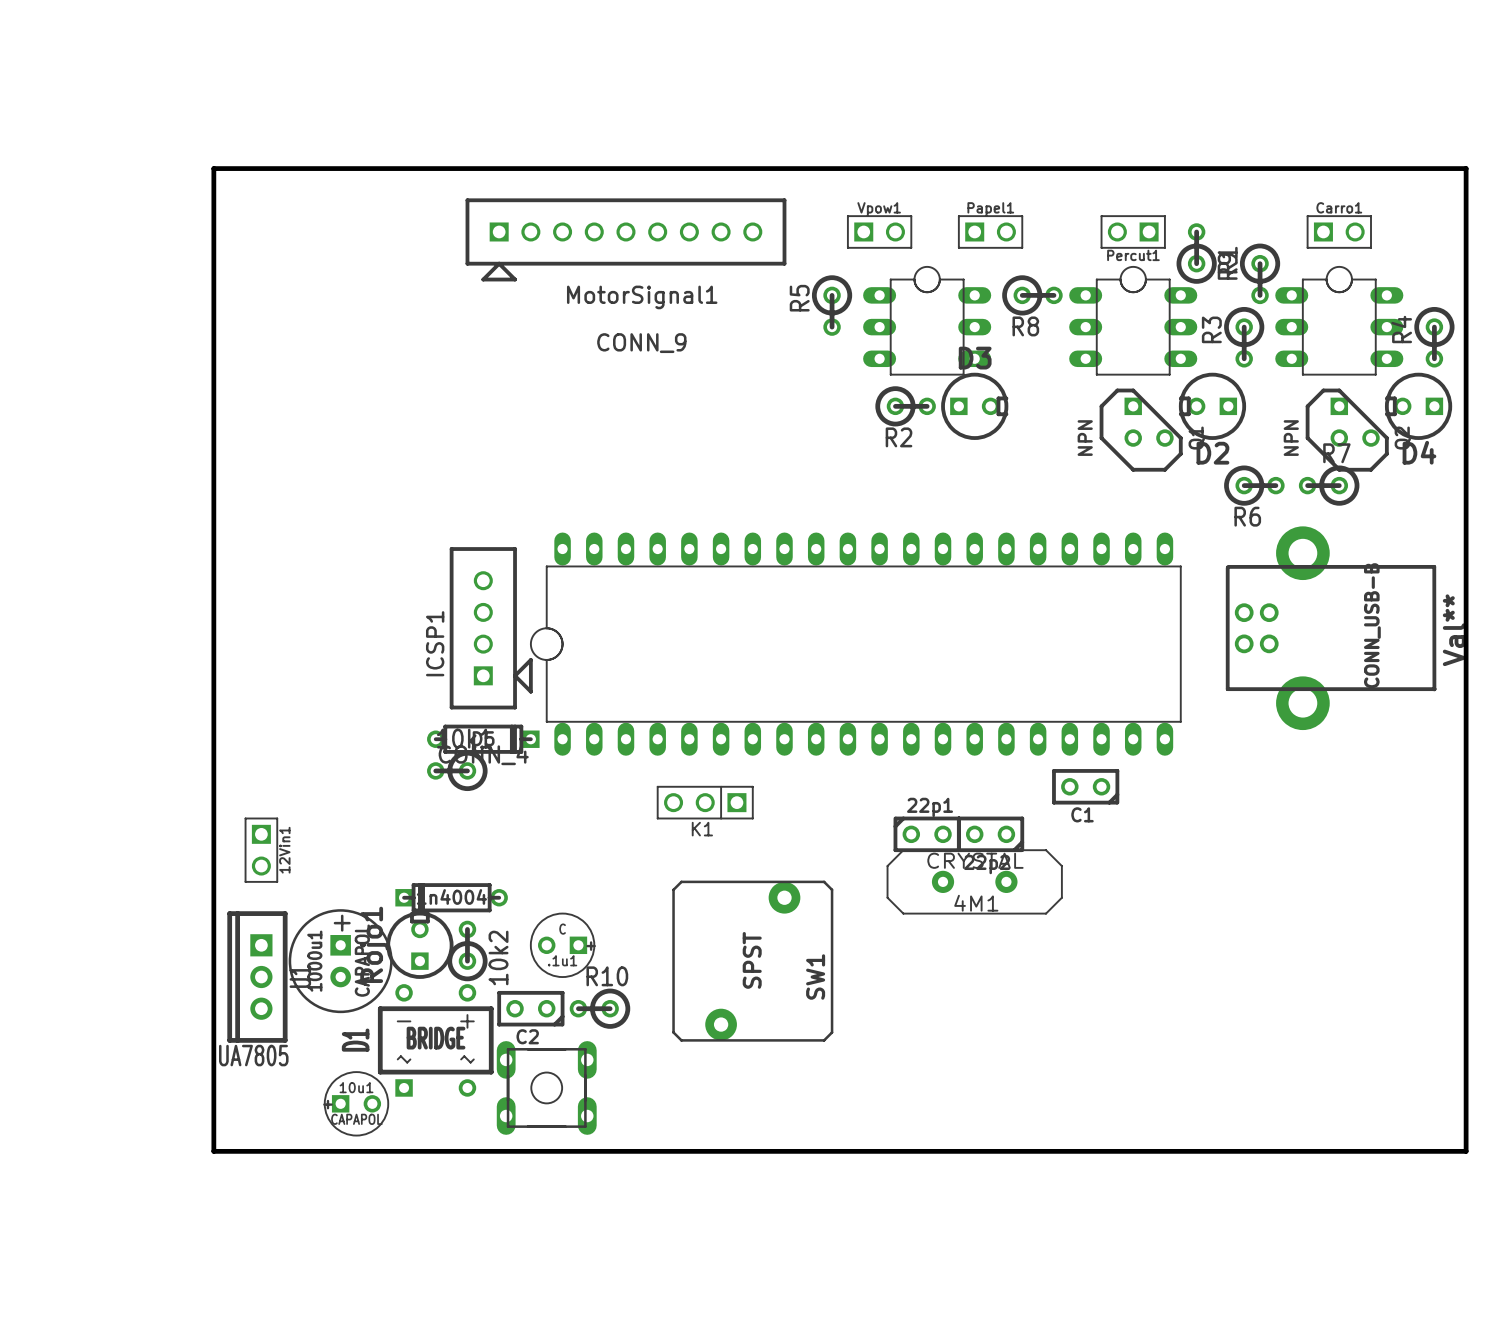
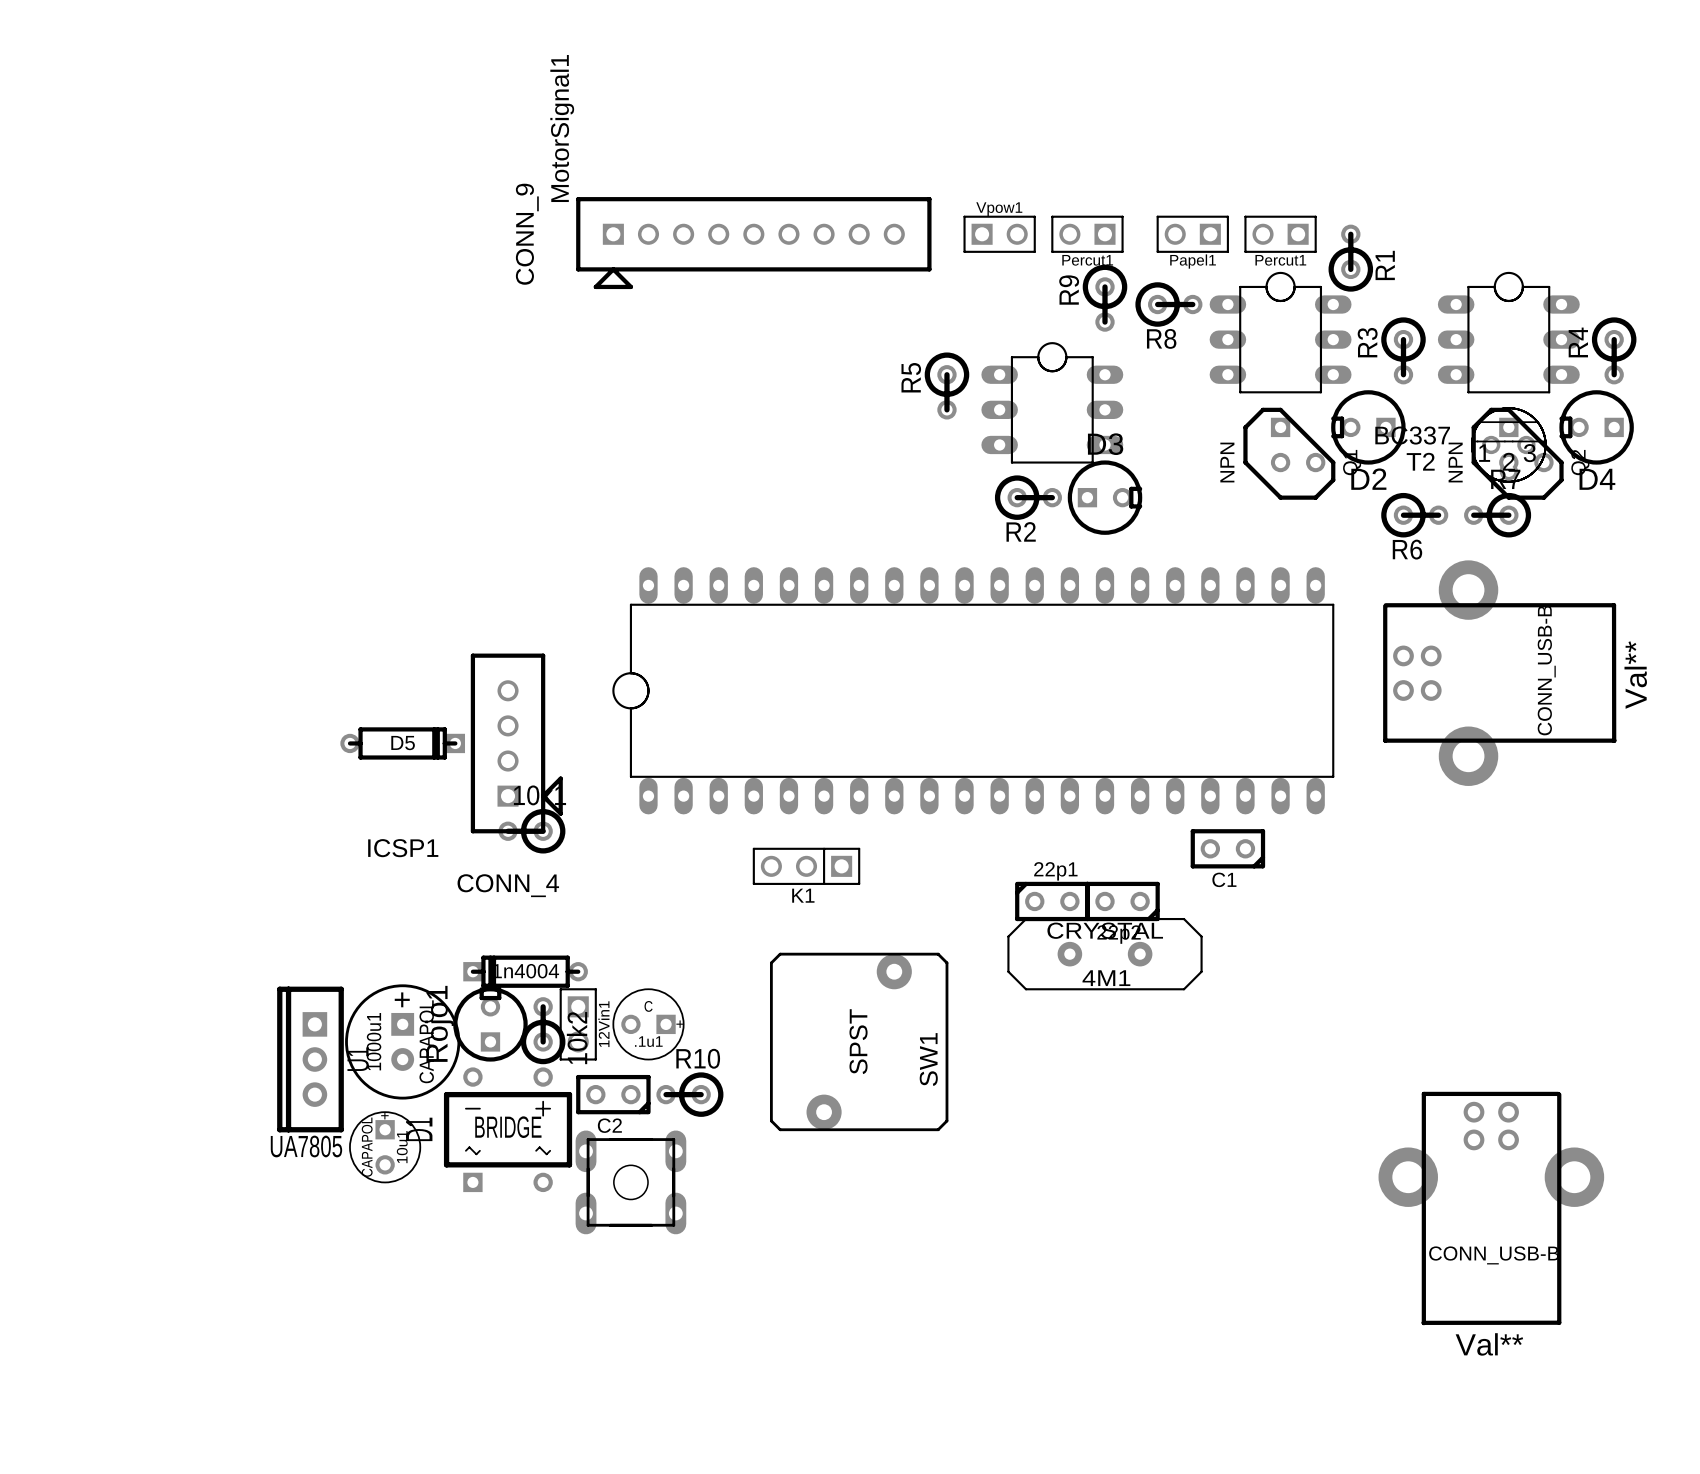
board edge: (213, 168) (213, 1151) (1466, 1151) (1466, 168) (213, 168) -> none
Percut1: none -> (1087, 234)
Papel1 rotation: 0° (990, 231) -> 180° (1192, 234)
Papel1 position: (990, 231) -> (1192, 234)
Carro1: (1339, 231) -> none
MotorSignal1 position: (625, 239) -> (753, 243)
R9 position: (1260, 273) -> (1105, 298)
MotorSignal1 name rotation: 0° (642, 297) -> 90° counterclockwise (562, 128)
MotorSignal1 name position: MotorSignal1 (642, 297) -> MotorSignal1 (562, 128)
R5 position: (832, 305) -> (946, 386)
part position: (927, 320) -> (1052, 402)
MotorSignal1 value rotation: 0° (641, 343) -> 90° counterclockwise (527, 234)
MotorSignal1 value position: CONN_9 (641, 343) -> CONN_9 (527, 234)
R2 position: (905, 406) -> (1028, 497)
D3 position: (974, 406) -> (1105, 497)
T2: none -> BC337 (1508, 444)
ICSP1 position: (491, 628) -> (516, 743)
ICSP1 name rotation: 0° (435, 643) -> 90° clockwise (403, 848)
ICSP1 name position: ICSP1 (435, 643) -> ICSP1 (403, 848)
D5 position: (483, 739) -> (402, 743)
12Vin1 position: (261, 850) -> (578, 1024)
10u1 rotation: 0° (356, 1103) -> 90° clockwise (385, 1147)
10u1 position: (356, 1103) -> (385, 1147)
CONN_USB-B: none -> Val** (1491, 1208)

